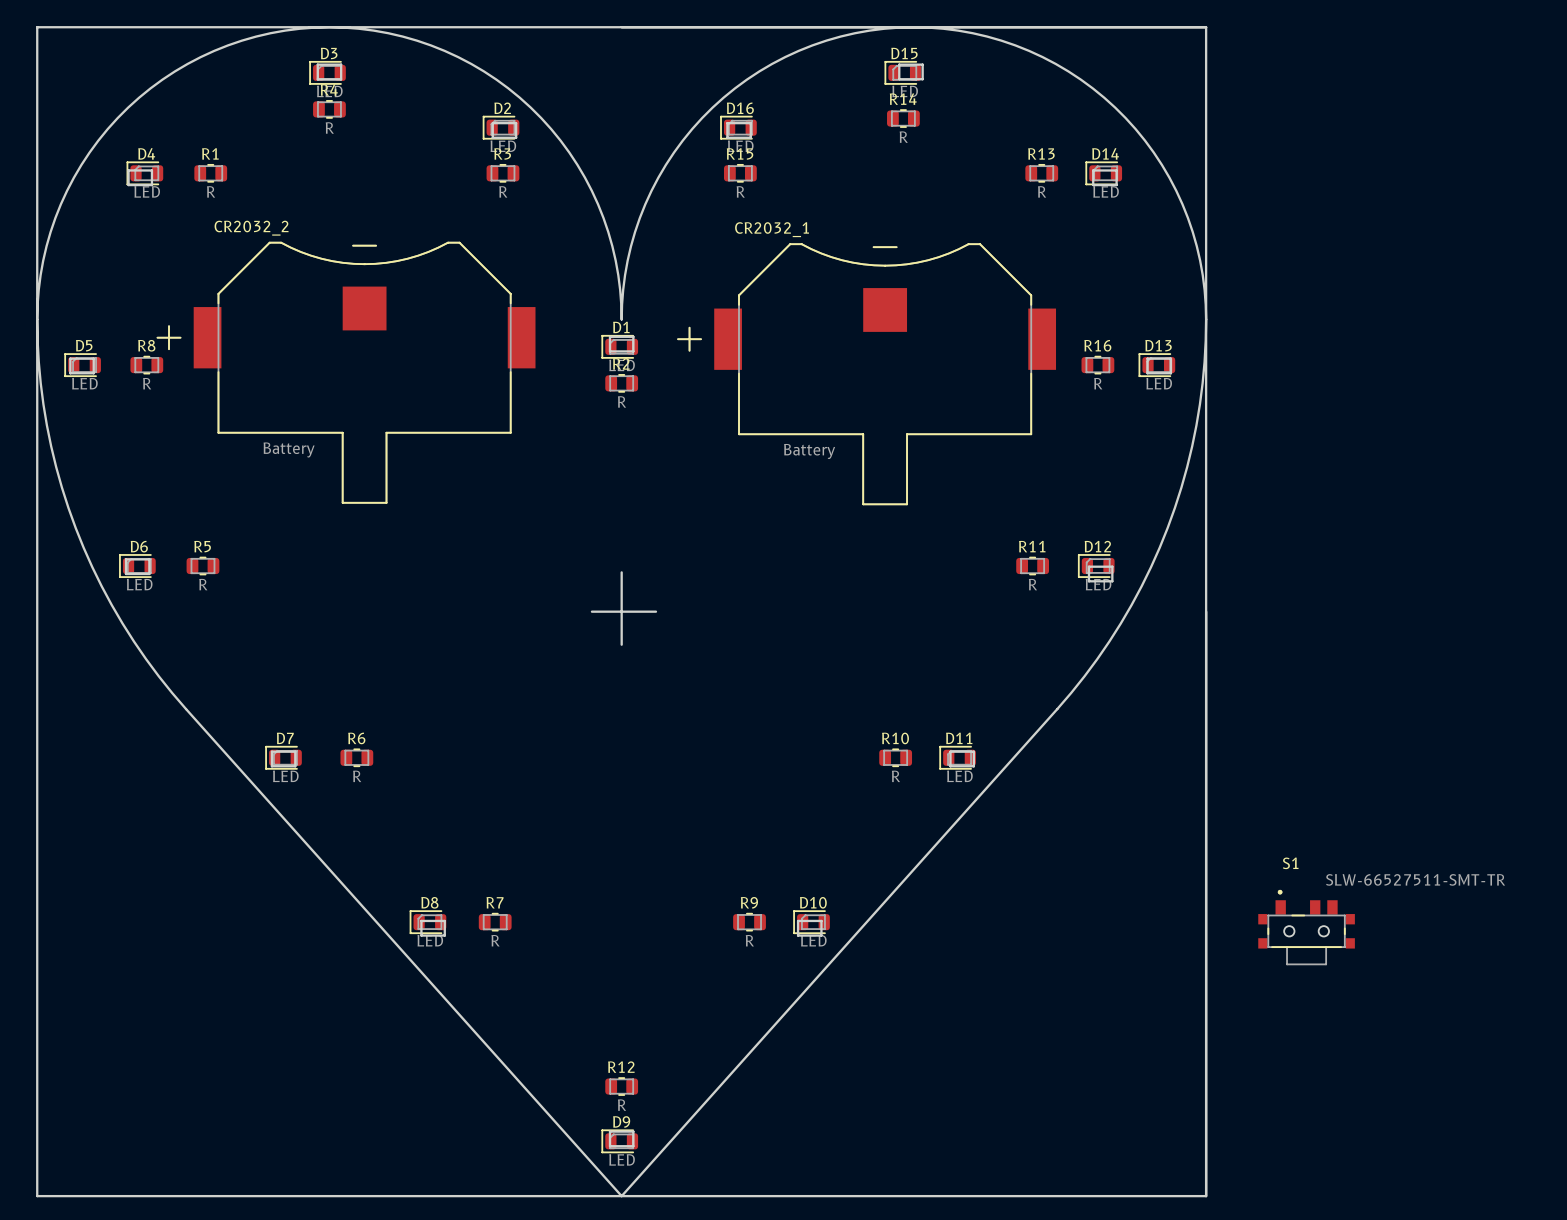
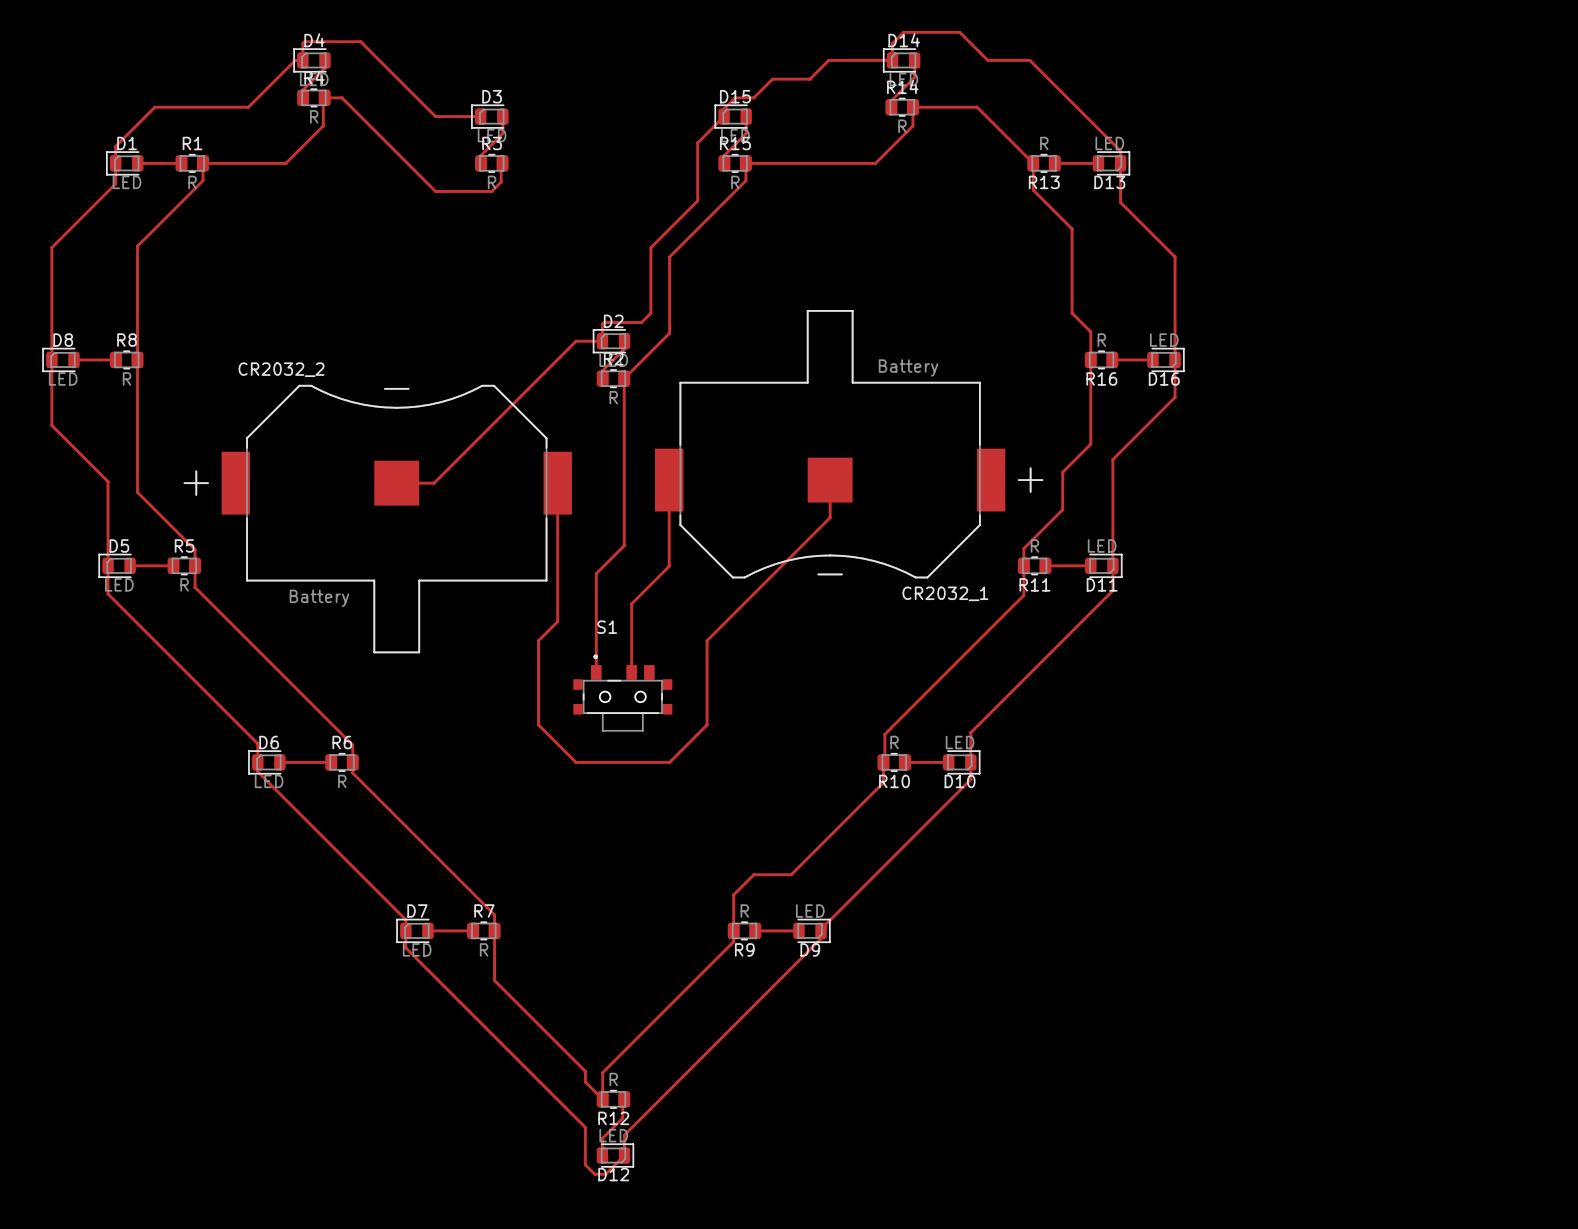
board edge: (37, 27) (37, 1196) (1206, 1196) (1206, 27) (37, 27) -> none
D3 name: D3 (329, 53) -> D4 (314, 40)
D15 name: D15 (904, 53) -> D14 (904, 40)
board edge: (317, 64) (341, 64) (341, 79) (317, 79) (317, 64) -> none
board edge: (899, 64) (922, 64) (922, 79) (899, 79) (899, 64) -> none
track: none -> (325, 60) (325, 68) (303, 89) (303, 97)
track: none -> (914, 60) (914, 77) (891, 100) (891, 107)
D2 name: D2 (502, 108) -> D3 (492, 96)
D16 name: D16 (740, 108) -> D15 (735, 96)
board edge: (492, 123) (492, 137) (516, 137) (516, 123) (492, 123) -> none
board edge: (727, 123) (750, 123) (750, 137) (727, 137) (727, 123) -> none
track: none -> (480, 116) (435, 116) (360, 41) (304, 41) (302, 43) (302, 60) (295, 60) (248, 107) (154, 107) (115, 146) (115, 183) (51, 247) (51, 425) (108, 481) (108, 593) (257, 743) (257, 771) (405, 919) (405, 947) (585, 1127) (585, 1164) (594, 1174) (605, 1174) (624, 1155) (624, 1135) (821, 938) (821, 929) (970, 779) (970, 732) (1112, 590) (1112, 459) (1175, 397) (1175, 256) (1120, 202) (1120, 151) (1029, 60) (987, 60) (959, 32) (903, 32) (892, 43) (892, 60) (828, 60) (810, 79) (772, 79) (753, 97) (735, 97) (724, 108) (724, 116) (697, 142) (697, 200) (650, 247) (650, 313) (641, 322) (604, 322) (602, 324) (602, 341) (576, 341) (434, 483) (396, 483)
track: none -> (502, 116) (502, 133) (481, 155) (481, 163)
track: none -> (746, 116) (746, 133) (724, 155) (724, 163)
D4 name: D4 (146, 153) -> D1 (127, 143)
R13 name position: R13 (1041, 153) -> R13 (1044, 182)
board edge: (128, 170) (151, 170) (151, 185) (128, 185) (128, 170) -> none
board edge: (1093, 170) (1093, 185) (1116, 185) (1116, 170) (1093, 170) -> none
track: none -> (137, 163) (181, 163)
track: none -> (502, 163) (501, 182) (491, 191) (435, 191) (342, 97) (323, 99) (323, 125) (285, 163) (203, 163) (203, 180) (137, 246) (137, 492) (195, 549) (195, 587) (352, 745) (352, 773) (494, 914) (494, 980) (585, 1071) (585, 1082) (602, 1099) (602, 1072) (733, 941) (733, 894) (753, 874) (791, 874) (883, 782) (884, 734) (1023, 595) (1023, 548) (1062, 509) (1062, 472) (1090, 444) (1090, 331) (1072, 313) (1072, 228) (1033, 190) (1033, 163) (977, 107) (912, 107) (912, 125) (875, 163) (745, 163) (745, 180) (669, 256) (669, 333) (624, 378) (624, 545) (596, 573) (596, 672)
track: none -> (1054, 163) (1098, 163)
D14: LED (1103, 173) -> none
R13 value position: R (1042, 191) -> R (1044, 143)
CR2032_1 name position: CR2032_1 (772, 229) -> CR2032_1 (945, 593)
CR2032_2 footprint: [156, 241, 536, 504] -> [183, 385, 572, 654]
CR2032_1 footprint: [677, 243, 1057, 506] -> [654, 310, 1044, 579]
board edge: (37, 319) (38, 362) (43, 404) (51, 446) (61, 487) (75, 527) (92, 567) (111, 605) (134, 641) (158, 676) (186, 709) (621, 1196) (1057, 709) (1084, 676) (1109, 641) (1131, 605) (1150, 567) (1167, 527) (1181, 487) (1192, 446) (1199, 404) (1204, 362) (1206, 319) (1202, 275) (1187, 217) (1169, 177) (1144, 140) (1115, 107) (1080, 79) (1042, 57) (1001, 40) (943, 28) (913, 27) (869, 30) (840, 36) (798, 50) (772, 63) (735, 88) (692, 129) (674, 152) (651, 190) (631, 246) (623, 289) (621, 319) (615, 260) (597, 204) (569, 152) (541, 118) (496, 79) (444, 50) (388, 33) (329, 27) (270, 33) (214, 50) (162, 79) (117, 118) (81, 164) (60, 204) (43, 260) (37, 319) -> none
D1 name: D1 (621, 327) -> D2 (613, 321)
board edge: (609, 336) (633, 336) (633, 351) (609, 351) (609, 336) -> none
D5 name: D5 (84, 345) -> D8 (63, 340)
R16 name position: R16 (1097, 345) -> R16 (1101, 378)
track: none -> (624, 341) (624, 348) (602, 370) (602, 378)
board edge: (70, 358) (93, 358) (93, 373) (70, 373) (70, 358) -> none
board edge: (1147, 358) (1170, 358) (1170, 373) (1147, 373) (1147, 358) -> none
track: none -> (73, 359) (115, 359)
track: none -> (1112, 359) (1152, 359)
D13 rotation: 0° (1156, 365) -> 180° (1111, 163)
D13 position: (1156, 365) -> (1111, 163)
D16: none -> LED (1165, 359)
R16 value position: R (1098, 383) -> R (1101, 340)
CR2032_1 value position: Battery (809, 451) -> Battery (908, 368)
track: none -> (669, 480) (669, 566) (631, 603) (631, 672)
track: none -> (830, 480) (830, 517) (707, 640) (707, 724) (669, 762) (576, 762) (538, 724) (538, 640) (557, 621) (557, 483)
D6 name: D6 (139, 546) -> D5 (119, 545)
R11 name position: R11 (1032, 546) -> R11 (1034, 584)
board edge: (125, 559) (125, 574) (149, 574) (149, 559) (125, 559) -> none
track: none -> (130, 565) (173, 565)
track: none -> (1045, 565) (1090, 565)
board edge: (1088, 566) (1088, 581) (1112, 581) (1112, 566) (1088, 566) -> none
D12 rotation: 0° (1096, 566) -> 180° (615, 1155)
D12 position: (1096, 566) -> (615, 1155)
board edge: (621, 572) (621, 644) -> none
R11 value position: R (1032, 584) -> R (1034, 545)
board edge: (591, 611) (655, 611) -> none
D7 name: D7 (285, 738) -> D6 (269, 742)
R10 name position: R10 (895, 738) -> R10 (894, 781)
board edge: (271, 751) (271, 766) (295, 766) (295, 751) (271, 751) -> none
board edge: (950, 751) (973, 751) (973, 766) (950, 766) (950, 751) -> none
track: none -> (279, 762) (331, 762)
track: none -> (905, 762) (948, 762)
D11 rotation: 0° (957, 757) -> 180° (1103, 565)
D11 position: (957, 757) -> (1103, 565)
R10 value position: R (895, 776) -> R (894, 742)
S1 value: SLW-66527511-SMT-TR (1415, 879) -> none
D8 name: D8 (429, 902) -> D7 (417, 911)
R9 name position: R9 (749, 902) -> R9 (744, 949)
board edge: (421, 920) (444, 920) (444, 935) (421, 935) (421, 920) -> none
board edge: (798, 920) (821, 920) (821, 935) (798, 935) (798, 920) -> none
track: none -> (427, 930) (473, 930)
track: none -> (755, 930) (798, 930)
D10 rotation: 0° (811, 922) -> 180° (961, 762)
D10 position: (811, 922) -> (961, 762)
S1 position: (1306, 927) -> (622, 693)
R9 value position: R (749, 940) -> R (744, 911)
R12 name position: R12 (621, 1067) -> R12 (613, 1118)
track: none -> (624, 1099) (622, 1118) (602, 1138) (602, 1155)
R12 value position: R (622, 1105) -> R (613, 1079)
board edge: (609, 1131) (609, 1146) (633, 1146) (633, 1131) (609, 1131) -> none
D9 rotation: 0° (619, 1141) -> 180° (811, 930)
D9 position: (619, 1141) -> (811, 930)

